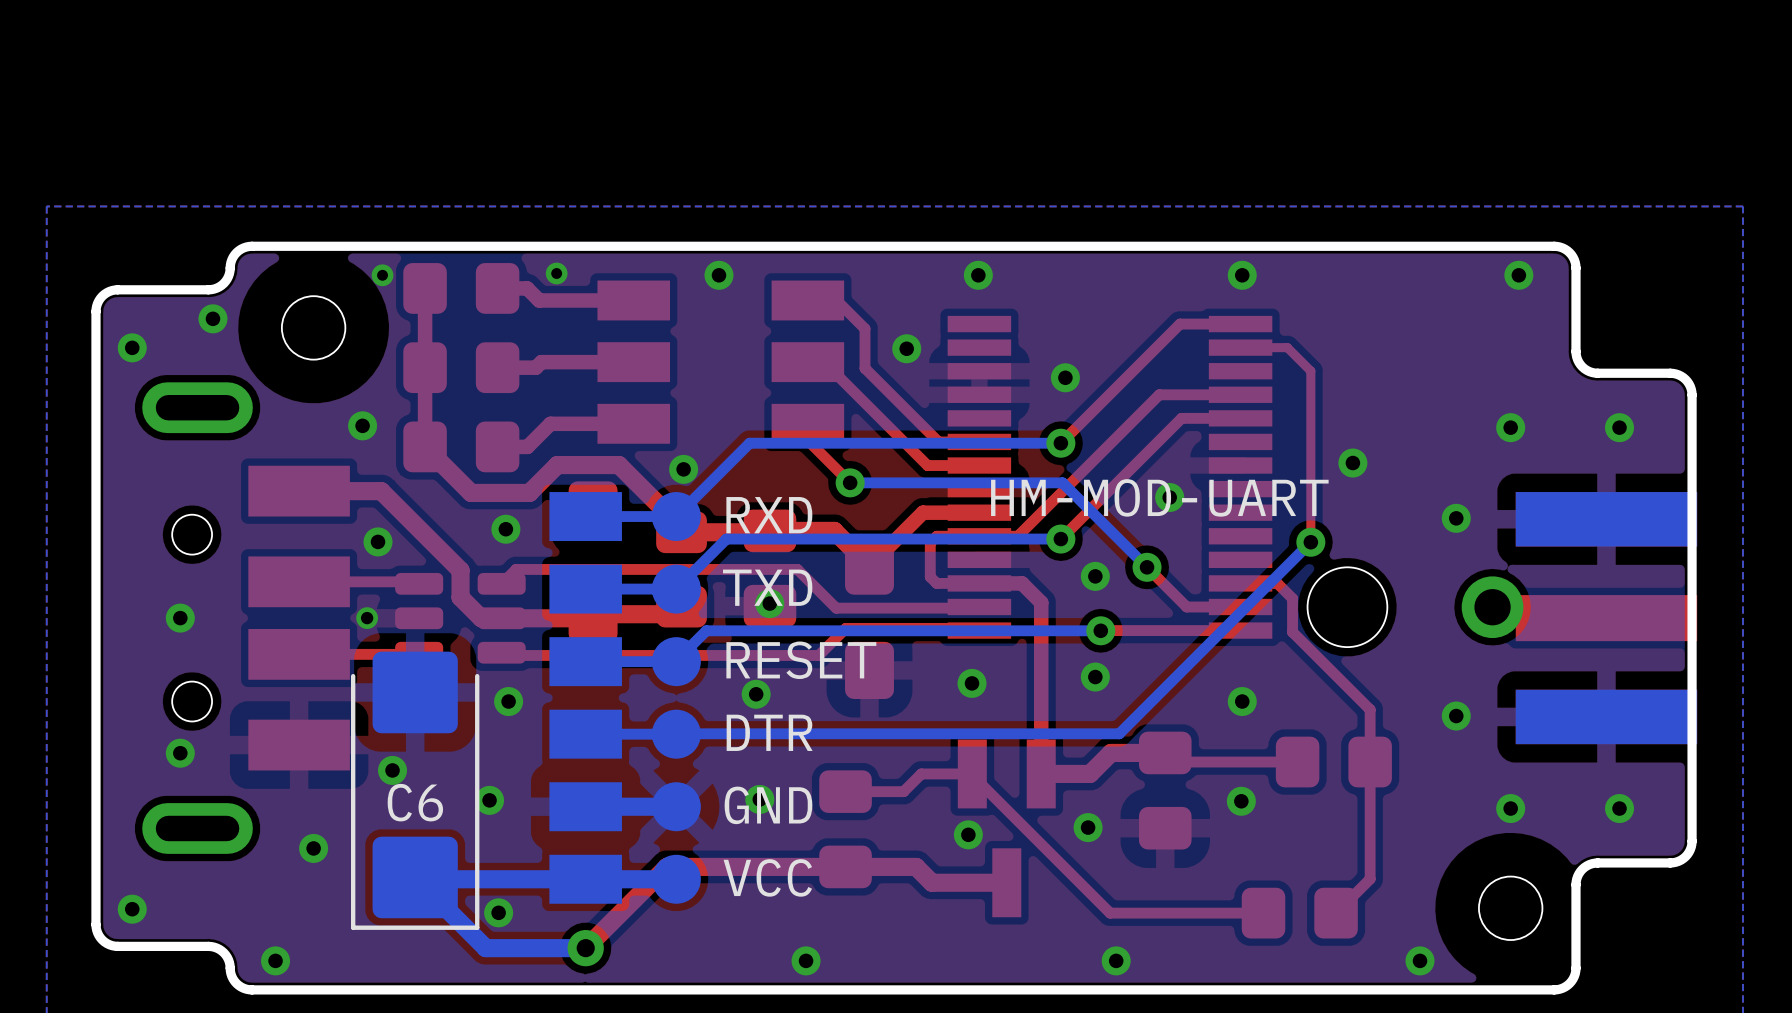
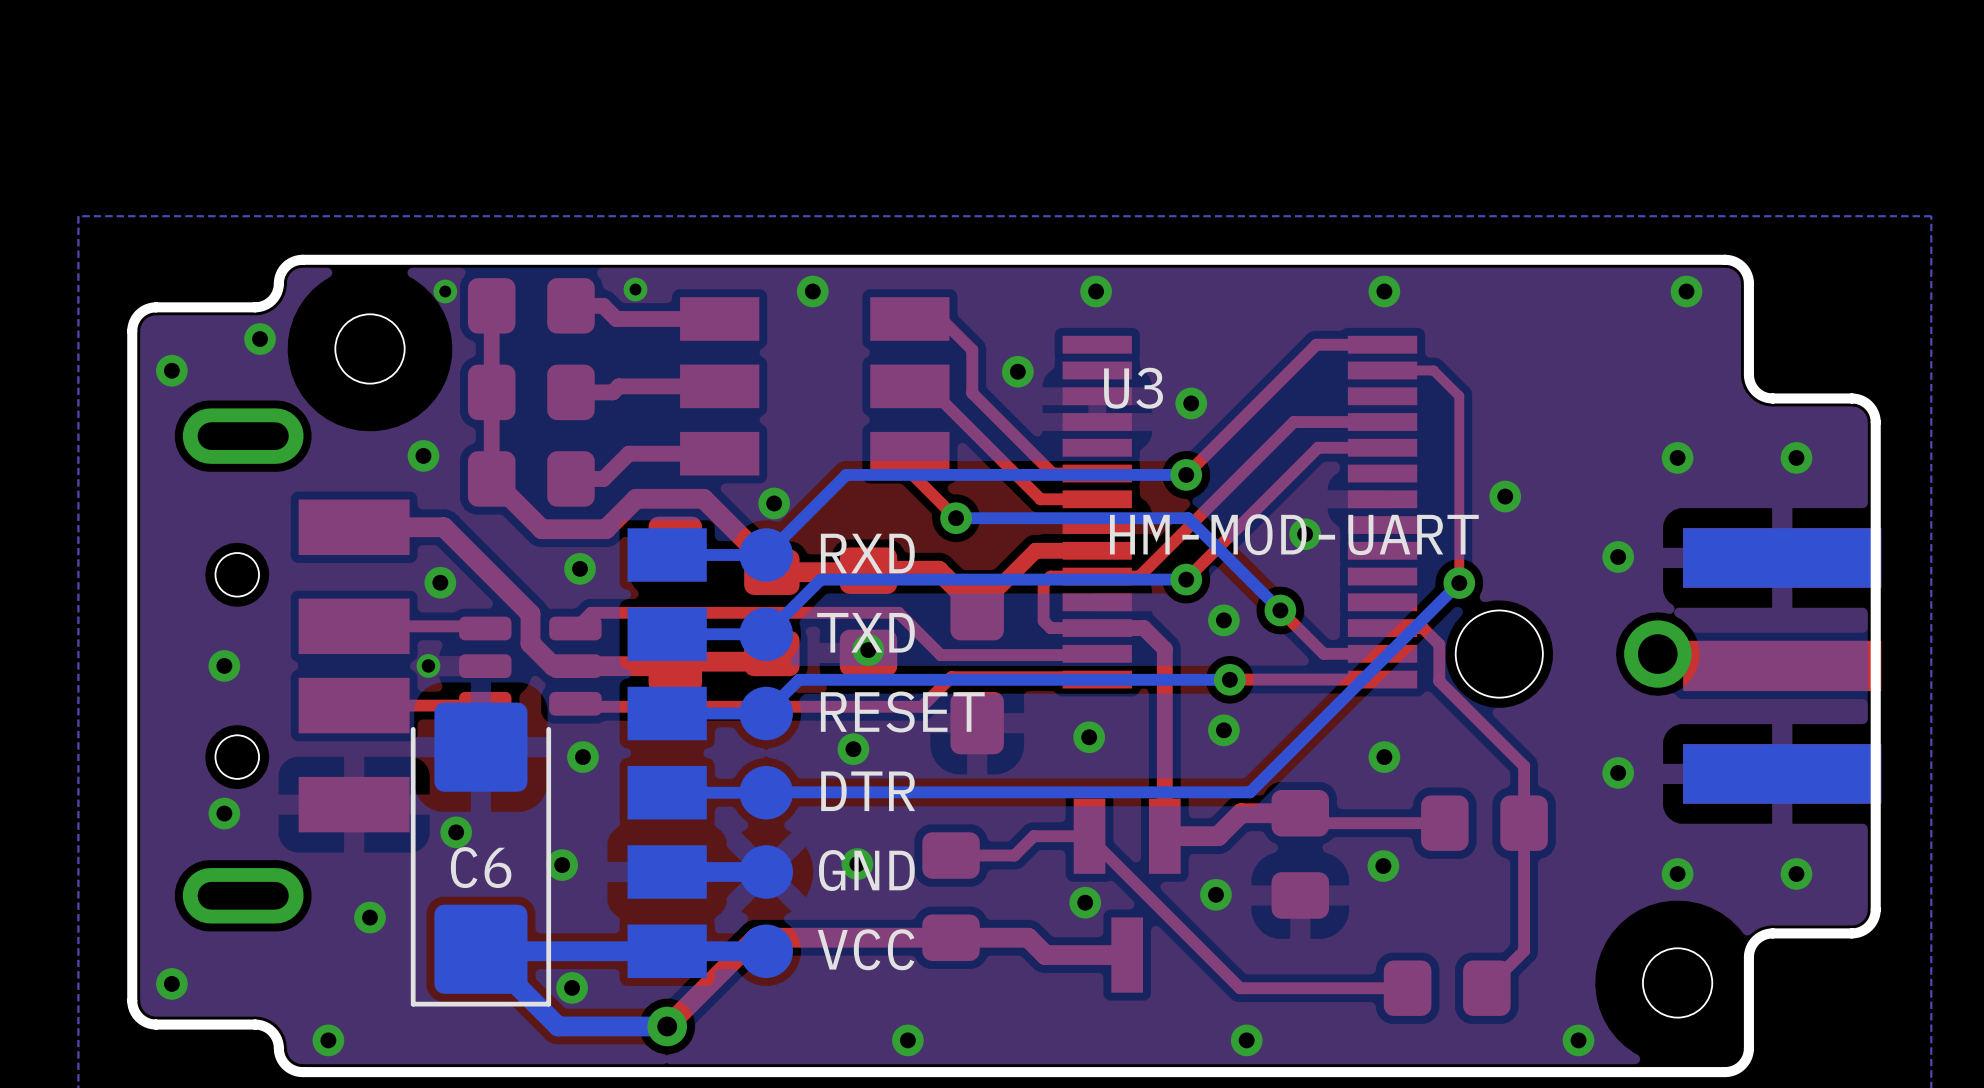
U3 name: none -> U3 (1133, 388)

